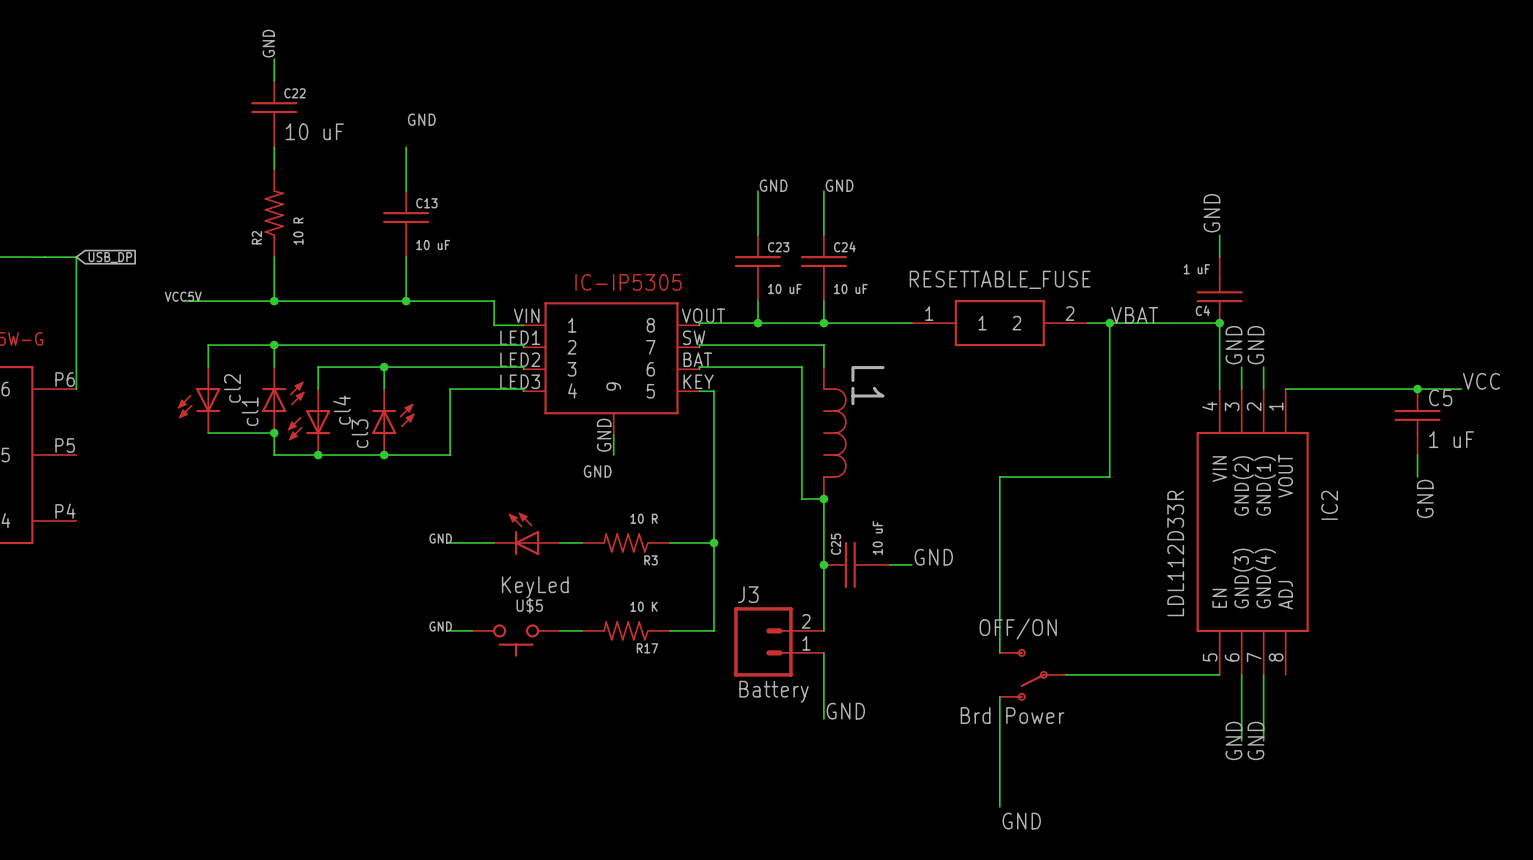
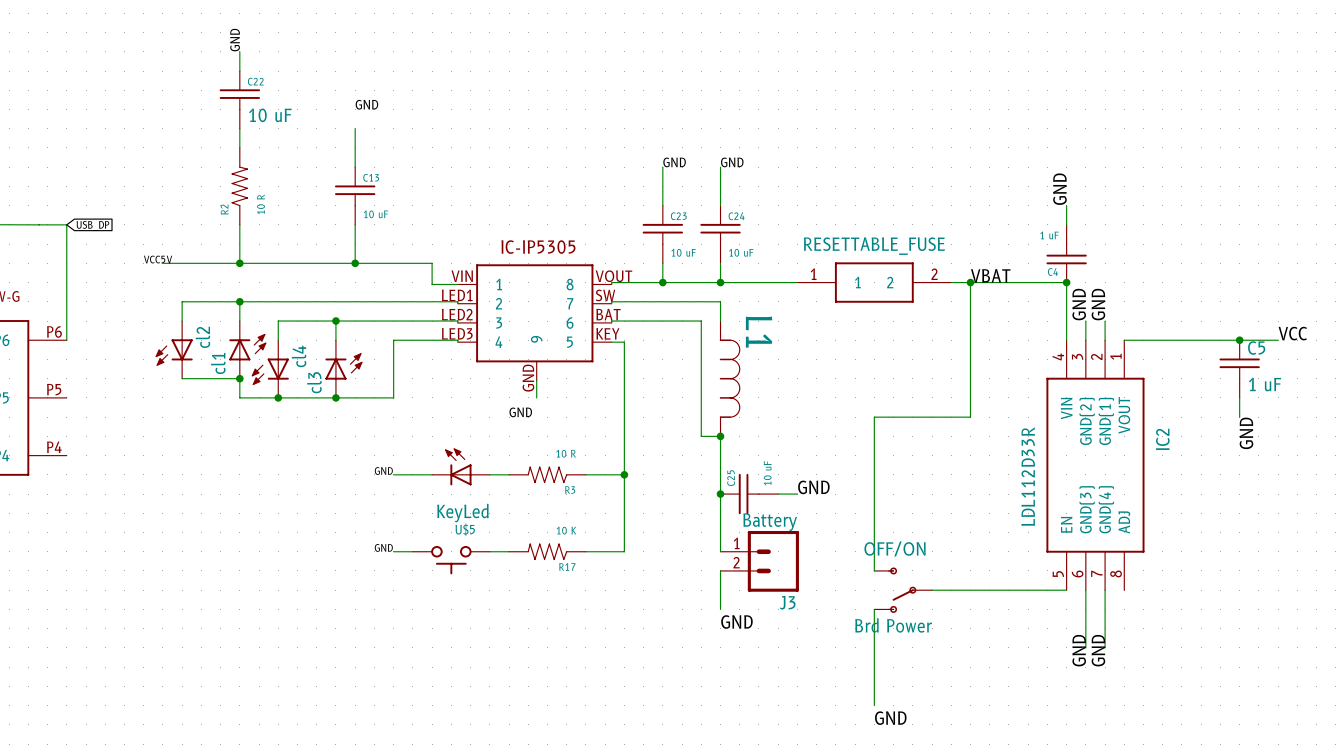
J3 rotation: 0° (763, 641) -> 180° (773, 561)
J3 position: (779, 641) -> (759, 561)
wire: (823, 696) (823, 718) -> none

